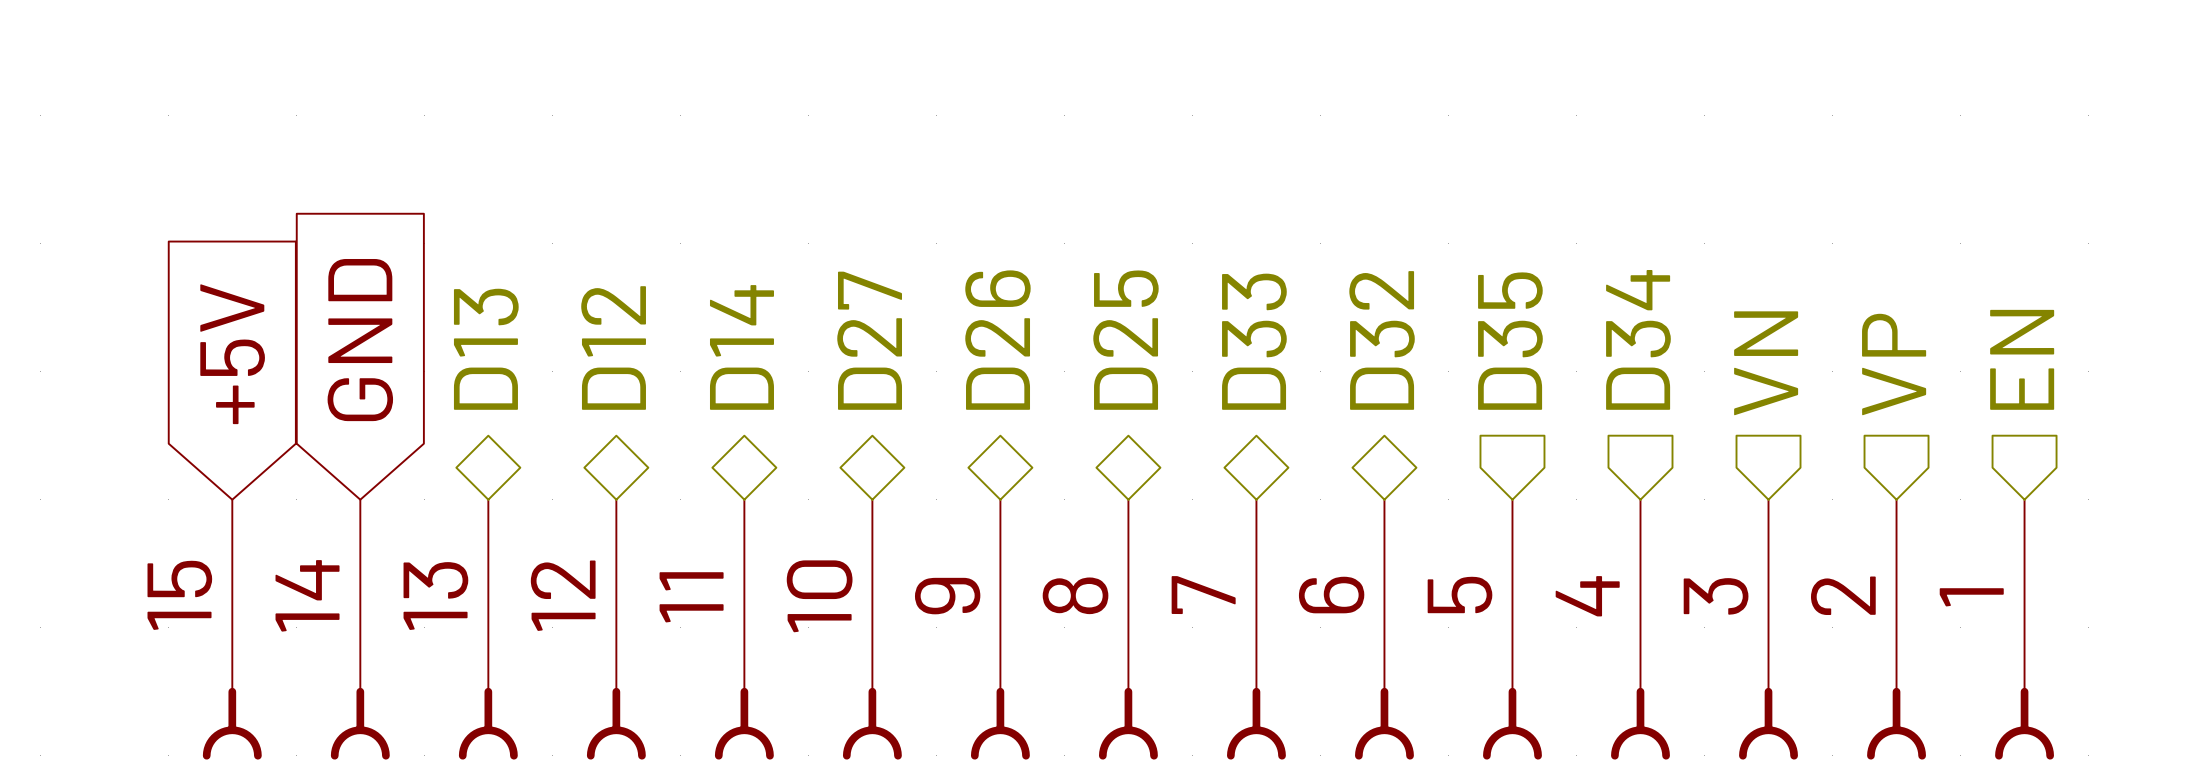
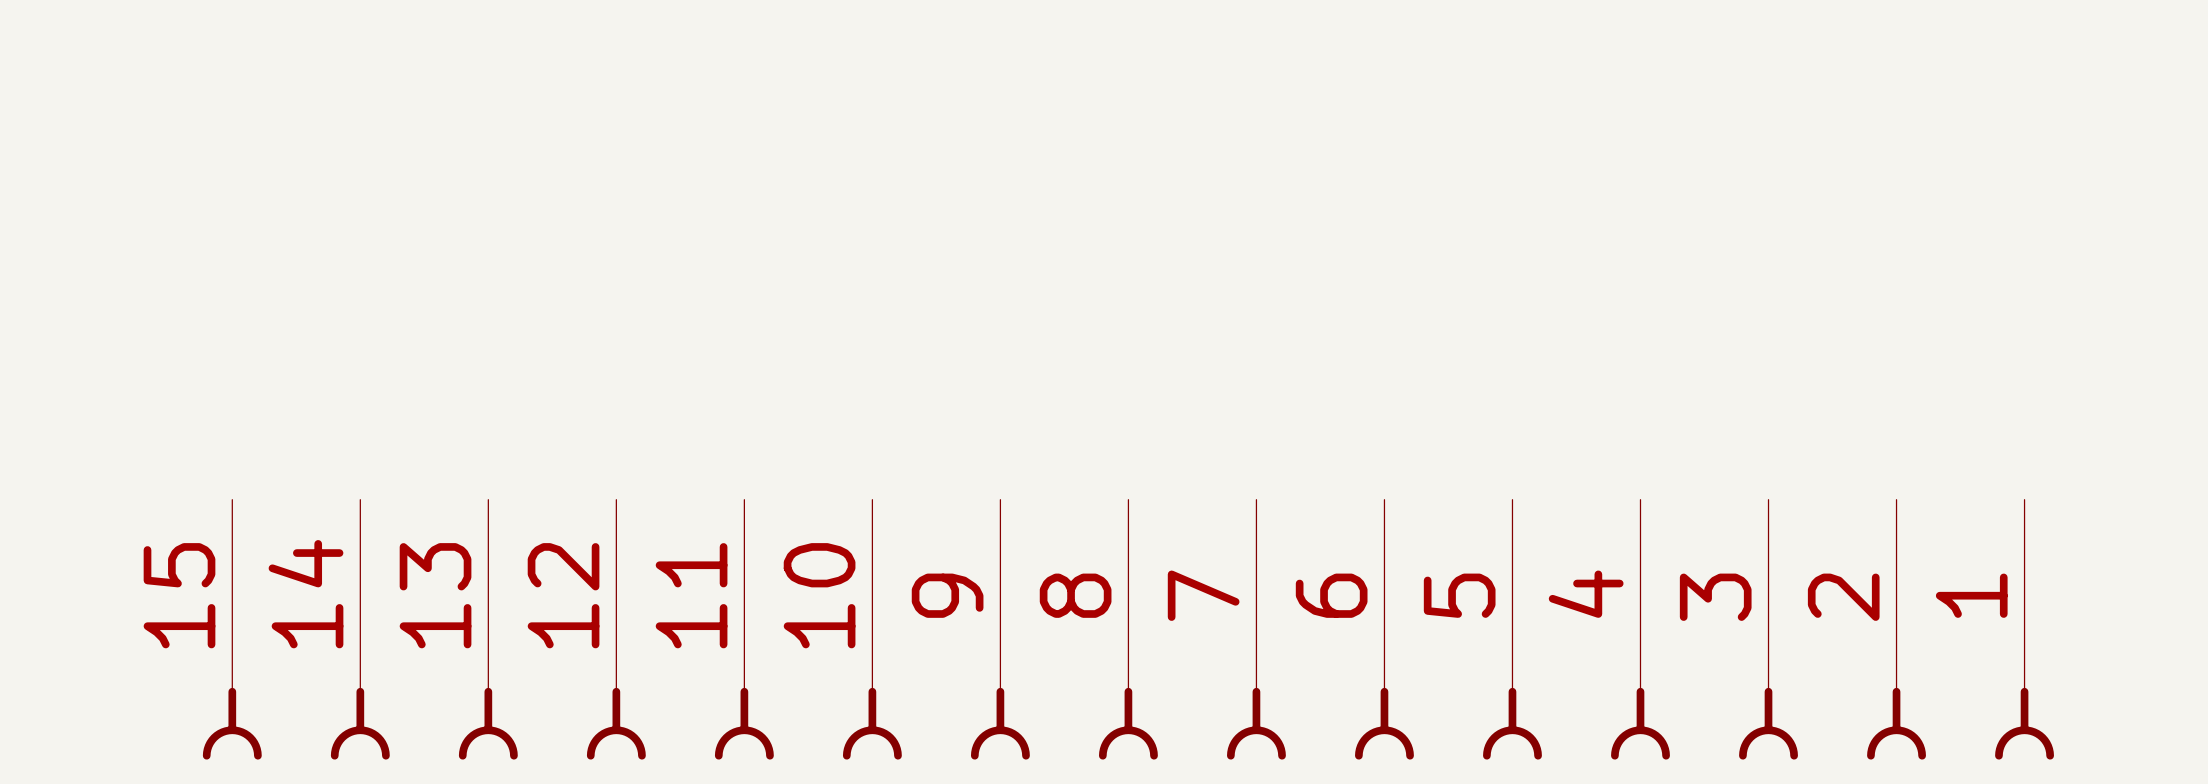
hierarchical label: D34 (1638, 339) -> none
global label: GND (360, 340) -> none
hierarchical label: D27 (869, 340) -> none
hierarchical label: D26 (997, 340) -> none
hierarchical label: D25 (1125, 340) -> none
hierarchical label: D32 (1382, 340) -> none
hierarchical label: D33 (1254, 341) -> none
hierarchical label: D35 (1510, 341) -> none
hierarchical label: D14 (741, 347) -> none
hierarchical label: D12 (613, 348) -> none
hierarchical label: D13 (486, 349) -> none
global label: +5V (232, 354) -> none
hierarchical label: EN (2022, 359) -> none
hierarchical label: VN (1766, 363) -> none
hierarchical label: VP (1894, 364) -> none

